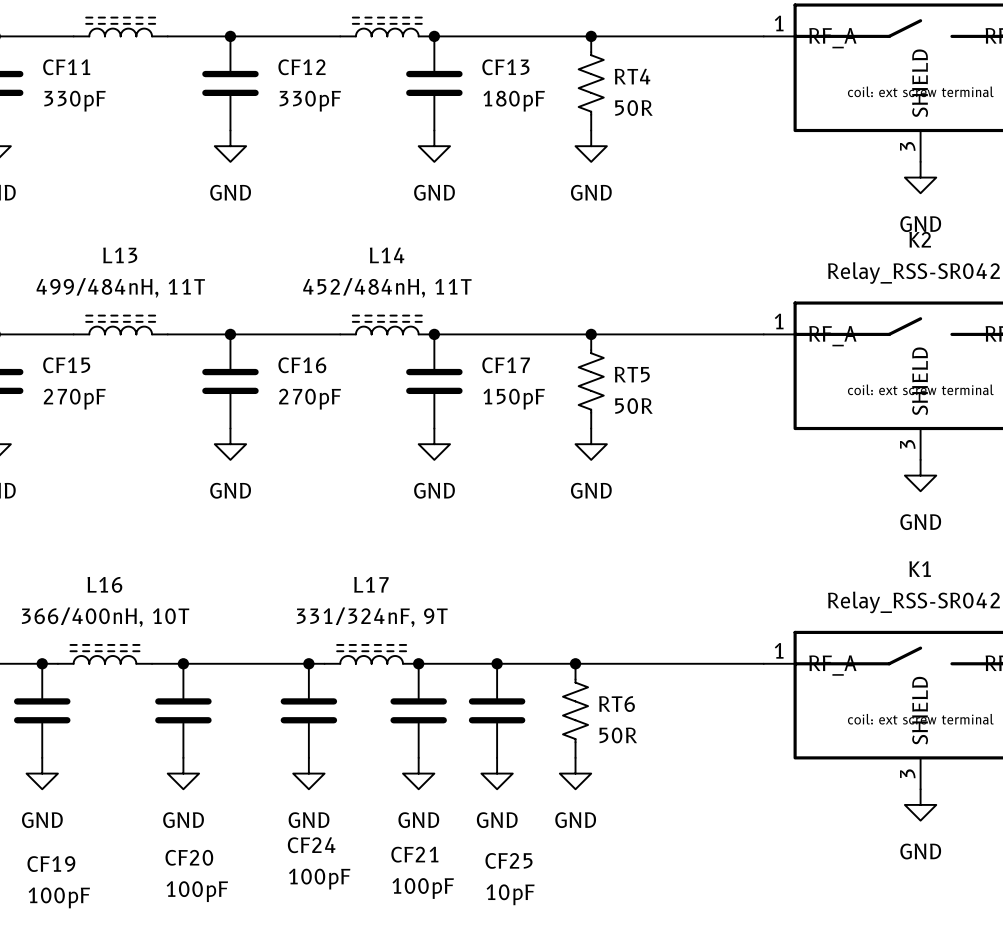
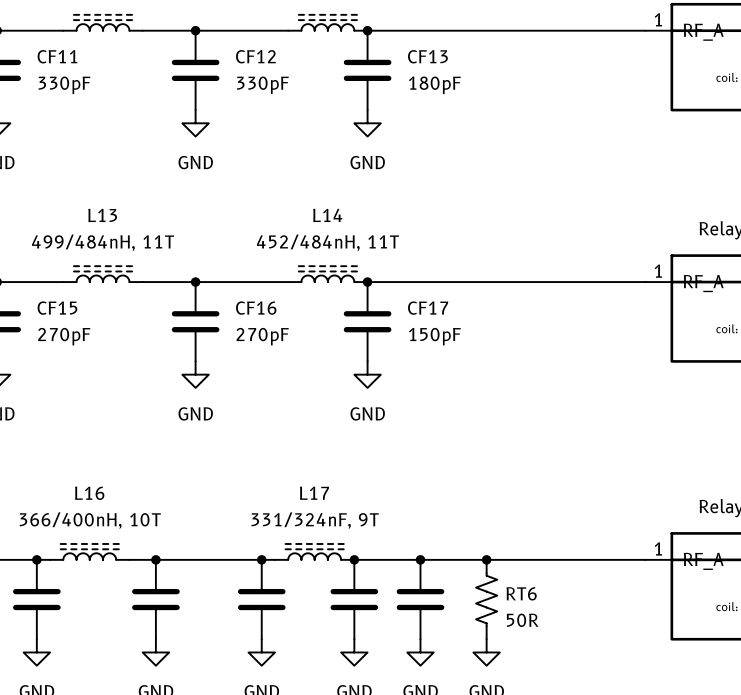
junction: (591, 36) -> none
RT4: 50R (591, 83) -> none
power symbol: GND (591, 146) -> none
junction: (591, 334) -> none
RT5: 50R (591, 381) -> none
power symbol: GND (591, 444) -> none

